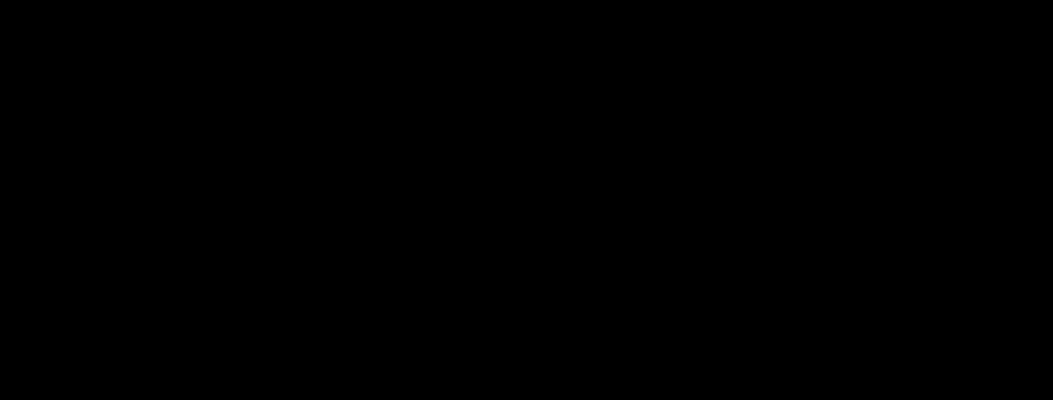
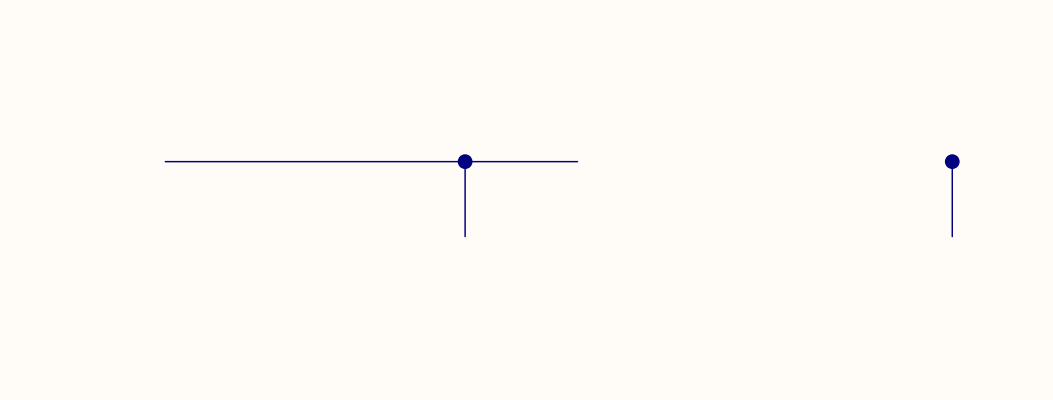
wire: none -> (165, 161) (577, 161)
wire: none -> (465, 161) (465, 236)
junction: none -> (465, 161)
wire: none -> (952, 161) (952, 236)
junction: none -> (952, 161)

